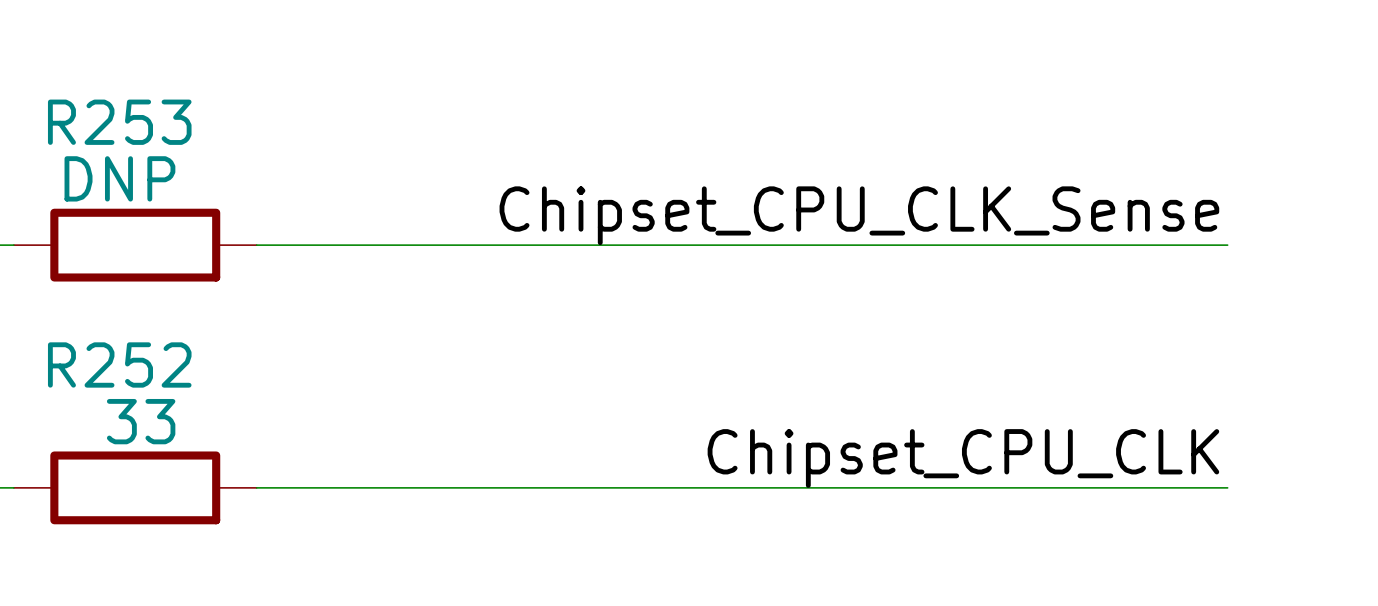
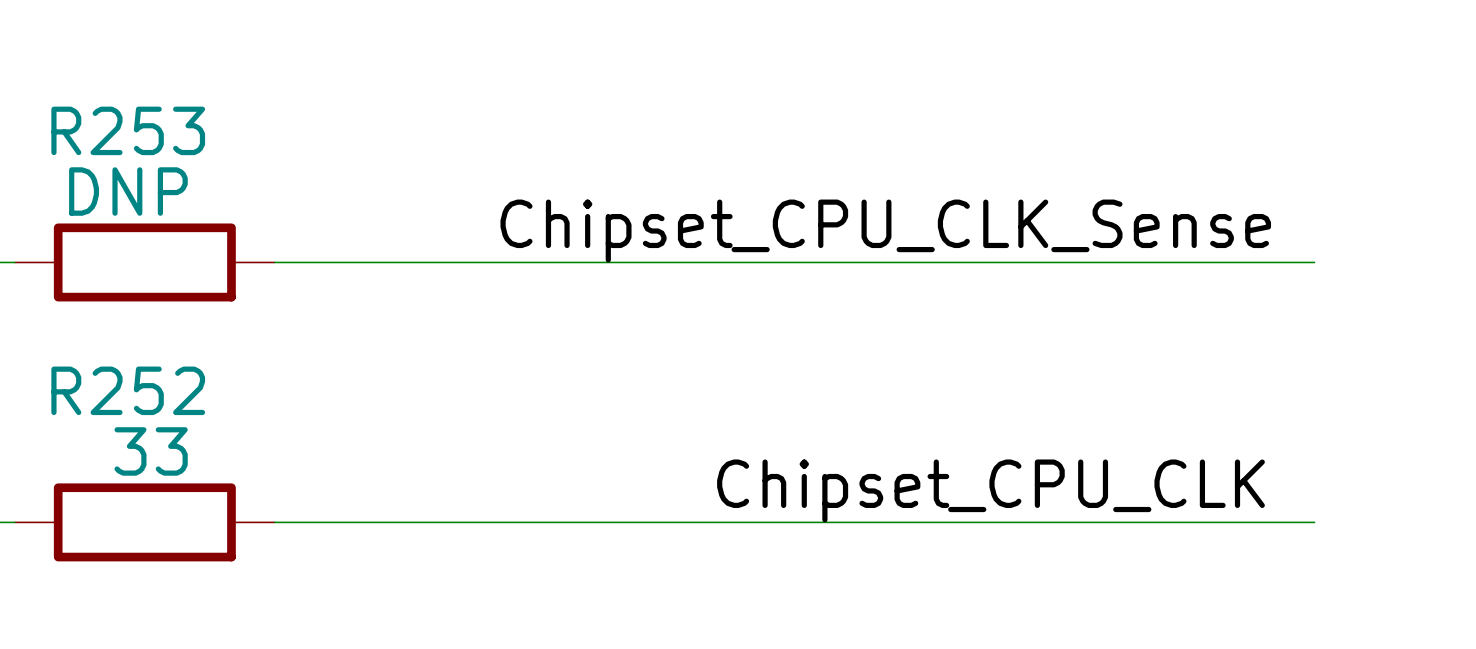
label position: Chipset_CPU_CLK_Sense (859, 215) -> Chipset_CPU_CLK_Sense (885, 231)
label position: Chipset_CPU_CLK (963, 458) -> Chipset_CPU_CLK (990, 490)

